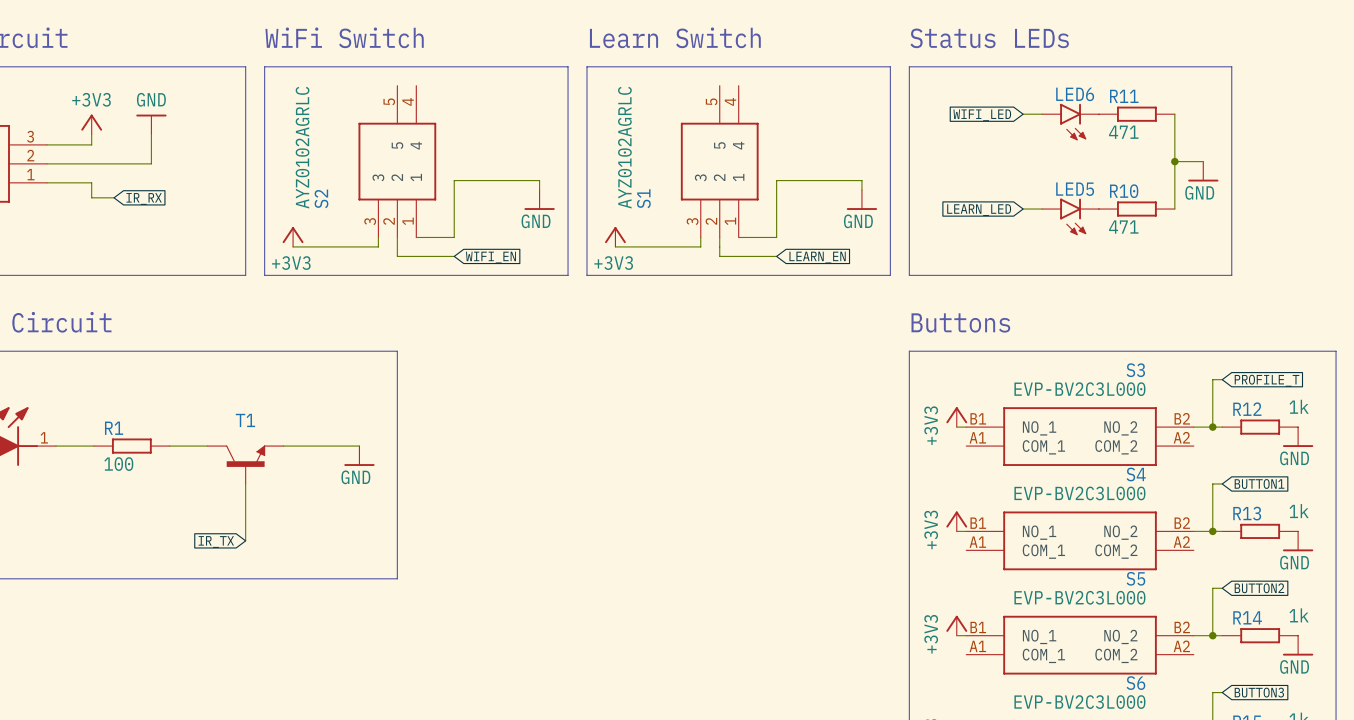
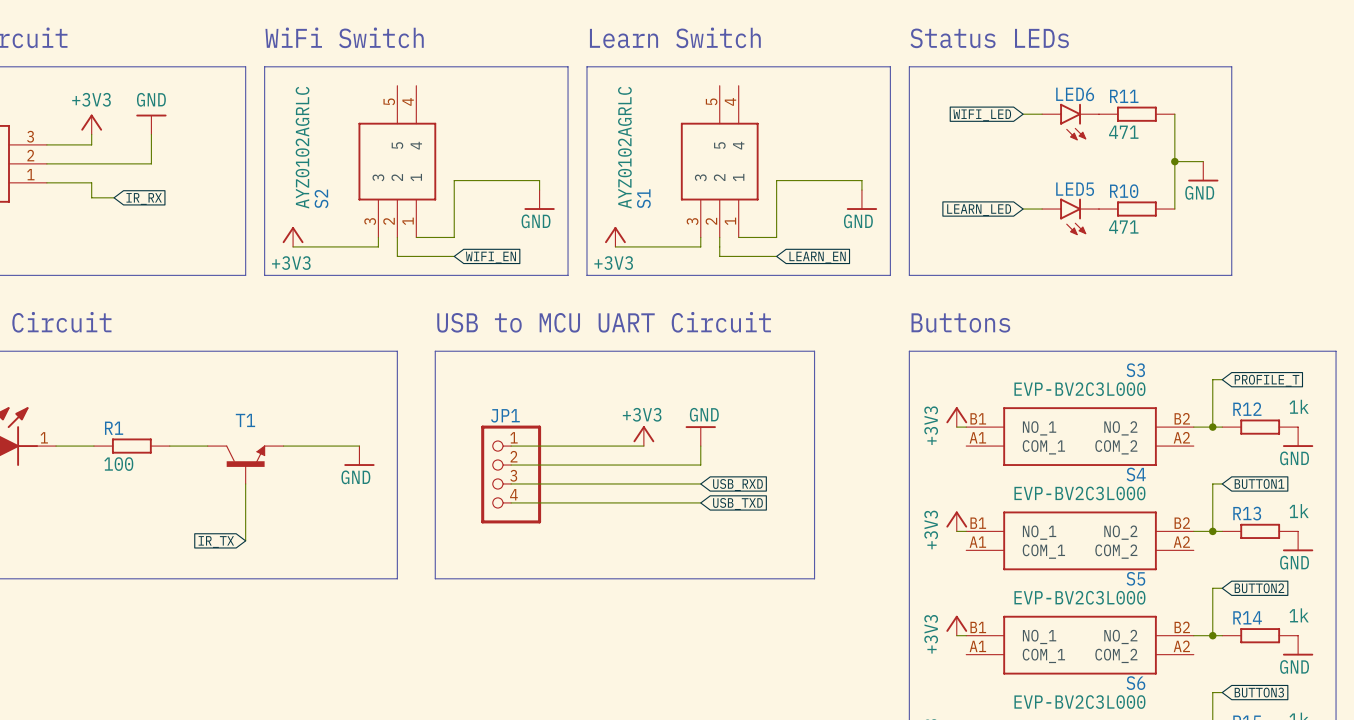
text: none -> USB to MCU UART Circuit (604, 322)
line: none -> (435, 351) (435, 578) (814, 578) (814, 351) (435, 351)
power symbol: none -> +3V3 (643, 436)
power symbol: none -> GND (700, 436)
wire: none -> (511, 446) (643, 446)
wire: none -> (700, 446) (700, 465) (511, 465)
JP1: none -> (511, 474)
wire: none -> (511, 483) (700, 483)
global label: none -> USB_RXD (737, 485)
wire: none -> (511, 502) (700, 502)
global label: none -> USB_TXD (737, 504)

